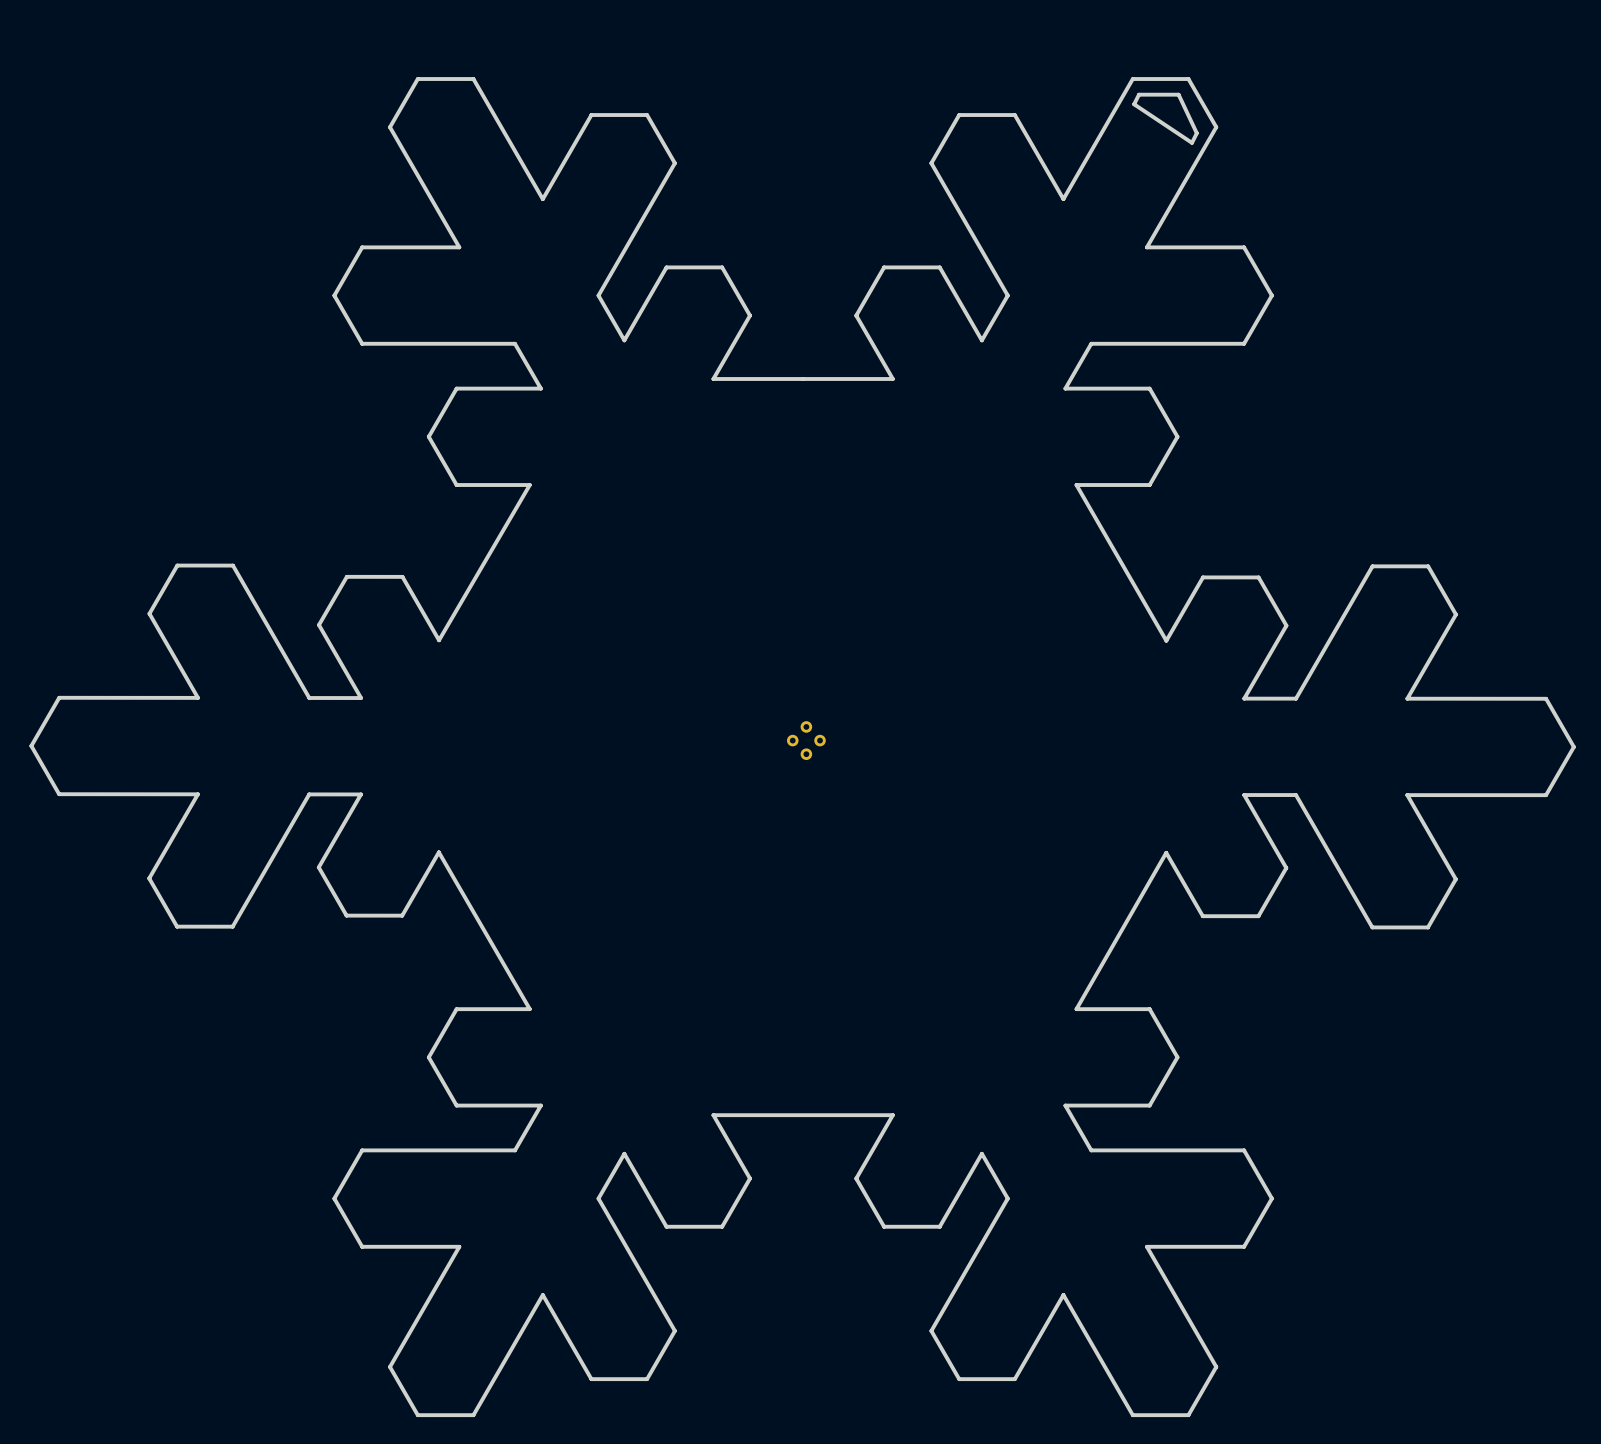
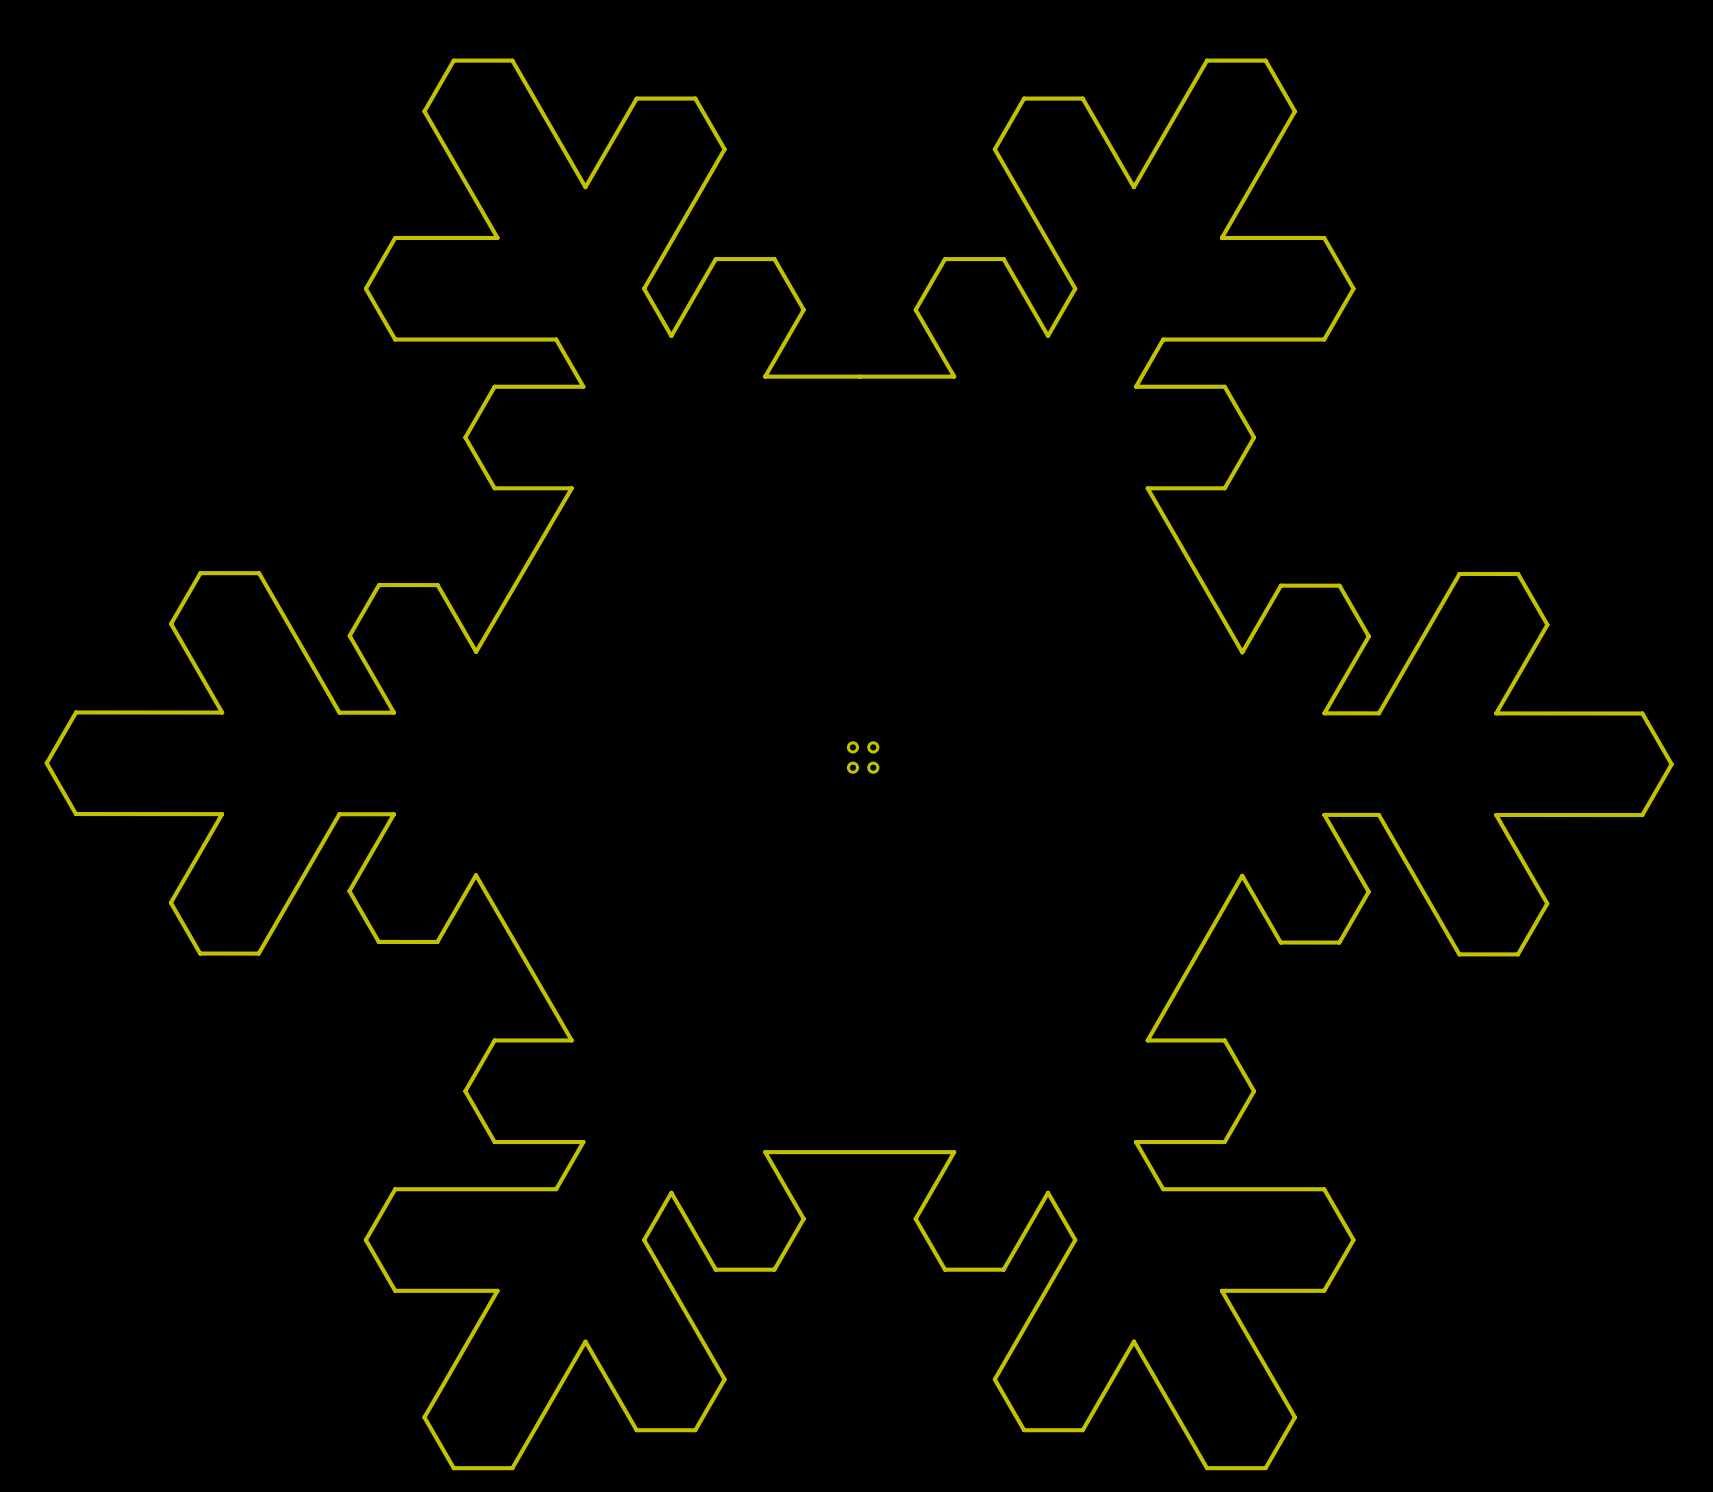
board edge: (1178, 94) (1138, 94) (1134, 104) (1192, 142) (1196, 133) (1178, 94) -> none
part rotation: 0° (806, 740) -> 45° clockwise (863, 757)

